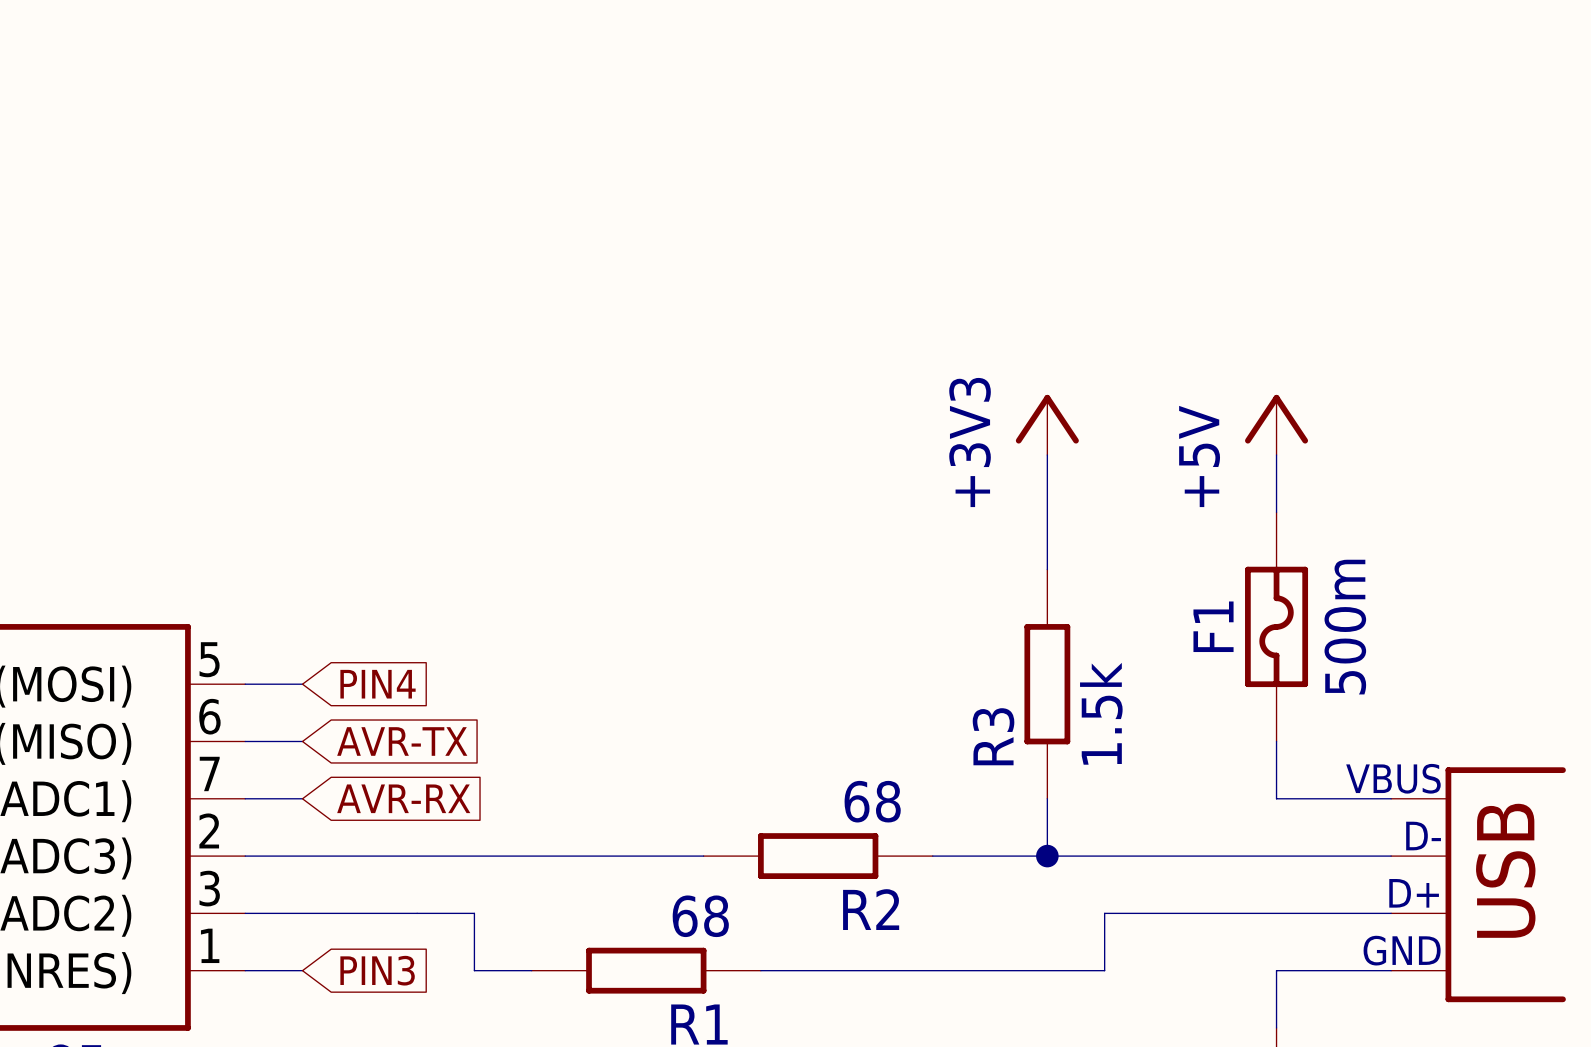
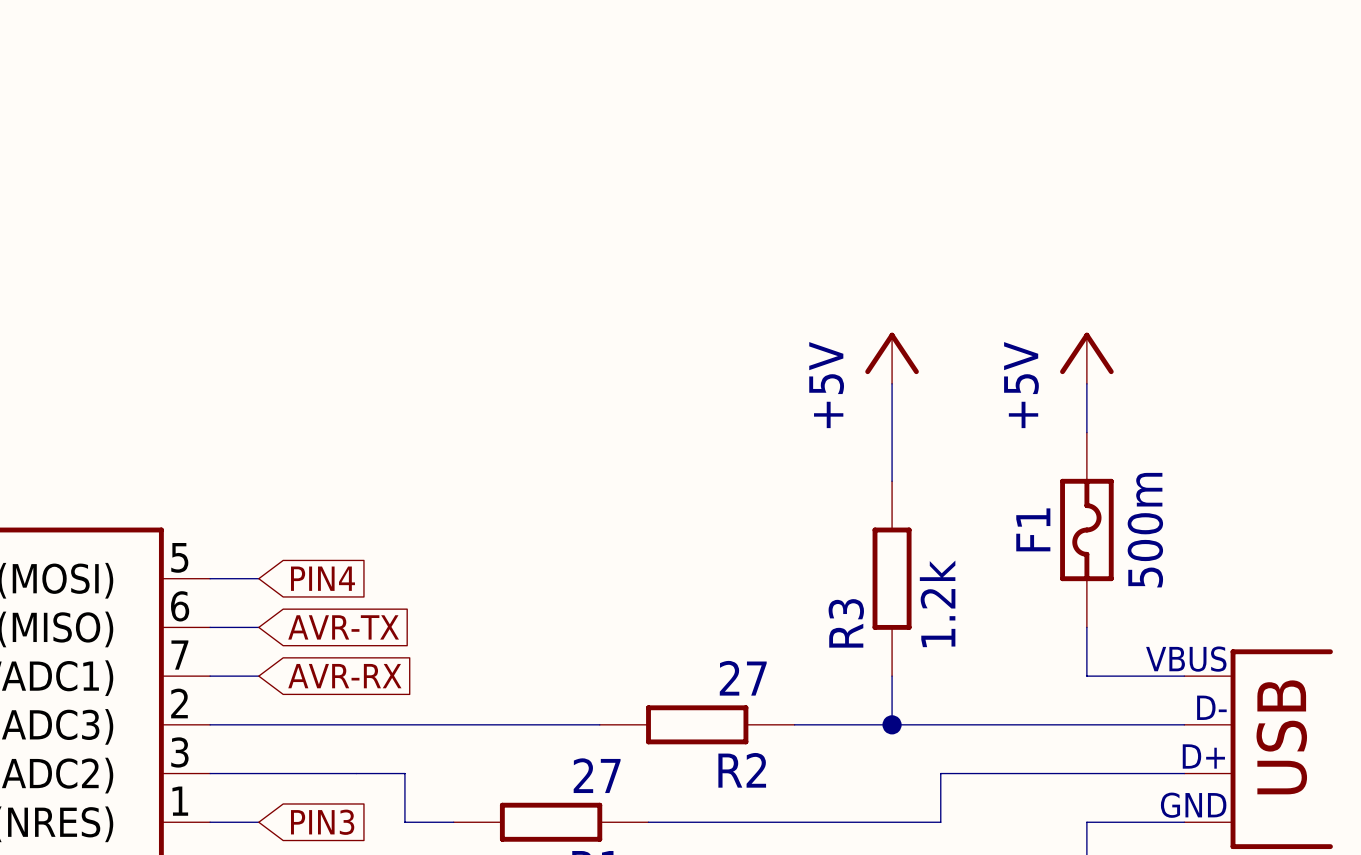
power symbol: +3V3 (1047, 424) -> +5V (892, 358)
R3 value: 1.5k (1101, 713) -> 1.2k (937, 603)
R2 value: 68 (872, 801) -> 27 (743, 678)
R1 value: 68 (700, 916) -> 27 (597, 775)

